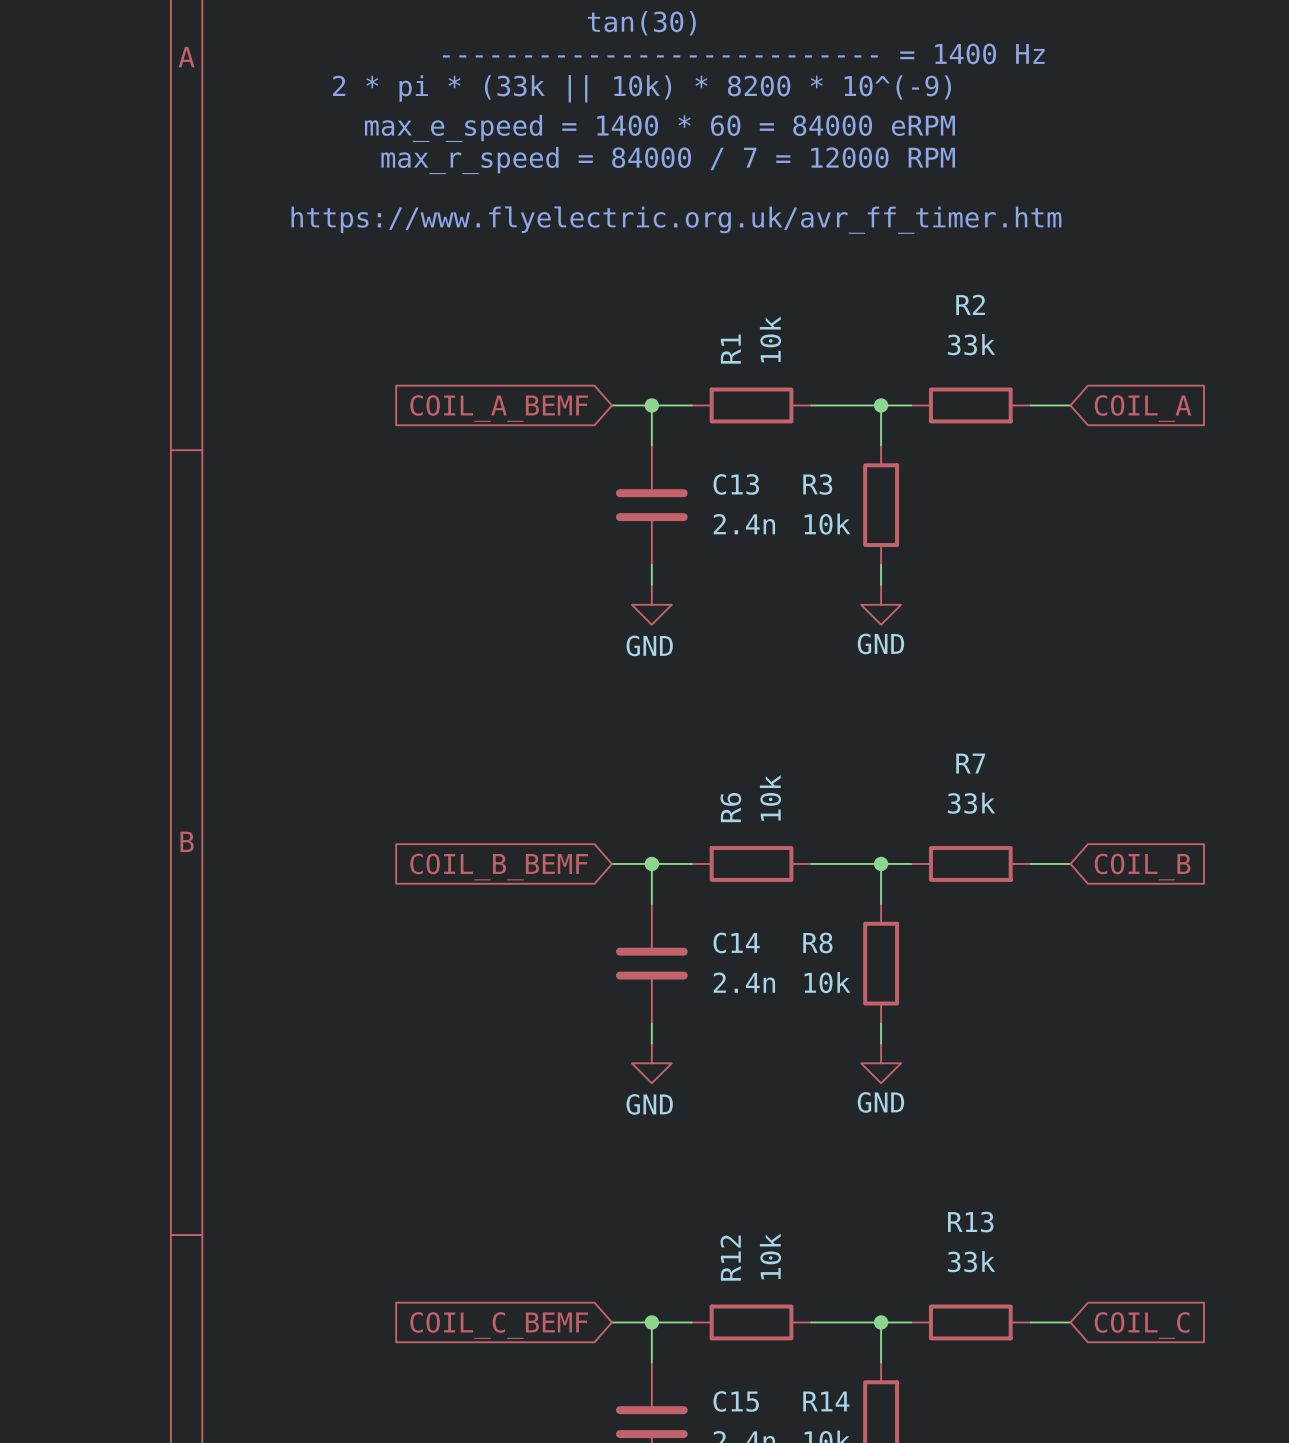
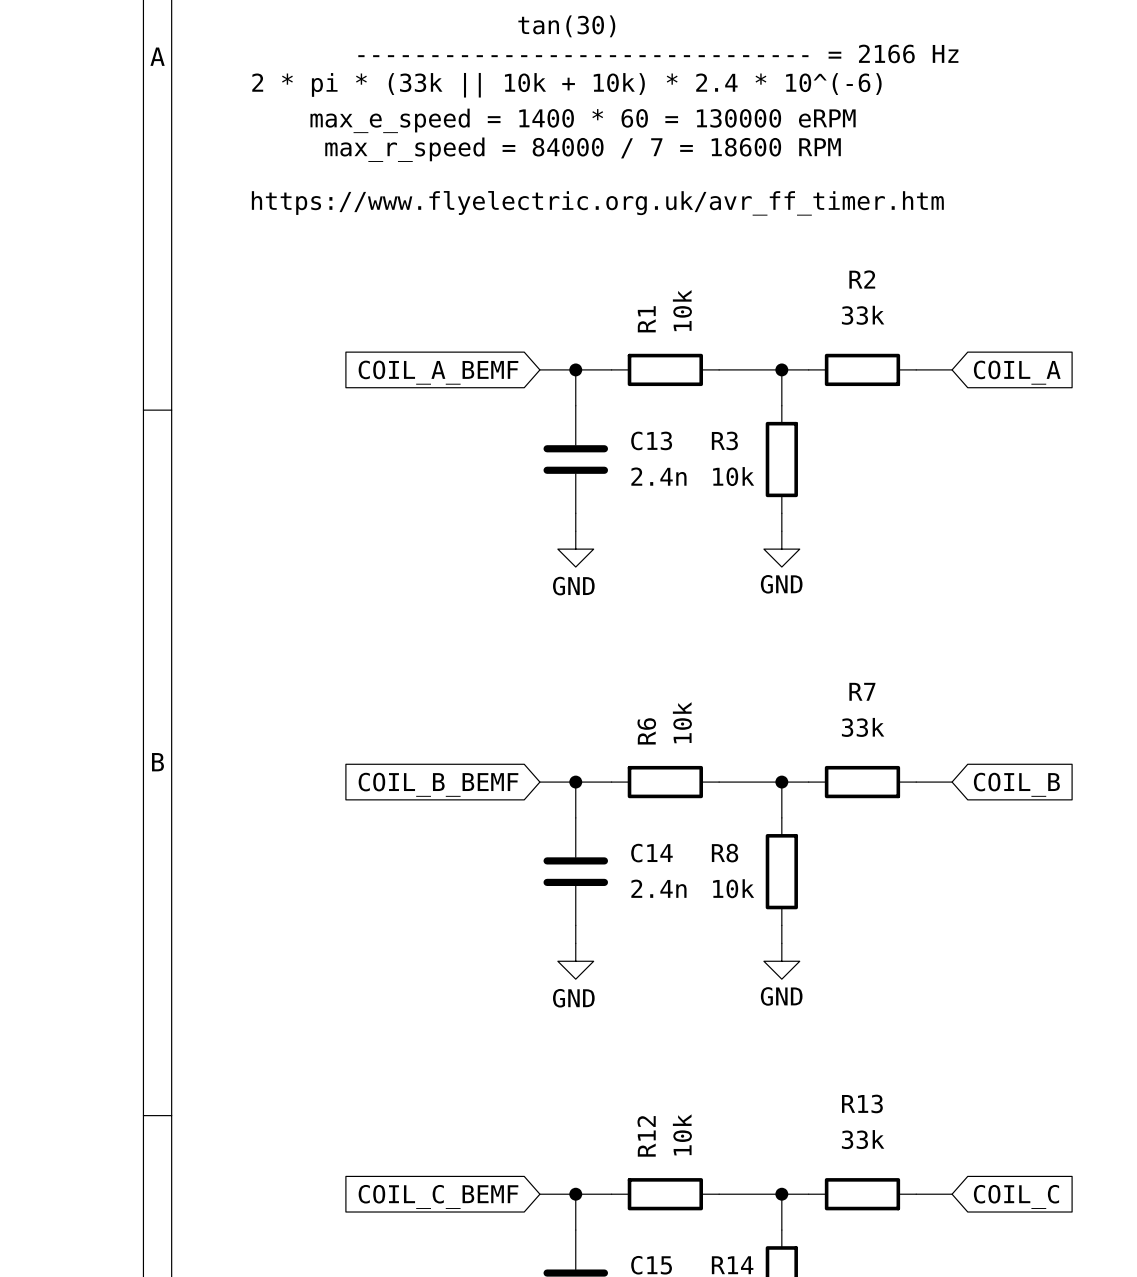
text: --------------------------- = 1400 Hz (743, 53) -> ------------------------------- = 2166 Hz (658, 53)
text: 2 * pi * (33k || 10k) * 8200 * 10^(-9) (642, 88) -> 2 * pi * (33k || 10k + 10k) * 2.4 * 10^(-6) (566, 85)
text: max_e_speed = 1400 * 60 = 84000 eRPM (659, 128) -> max_e_speed = 1400 * 60 = 130000 eRPM (583, 120)
text: max_r_speed = 84000 / 7 = 12000 RPM (668, 160) -> max_r_speed = 84000 / 7 = 18600 RPM (583, 149)

